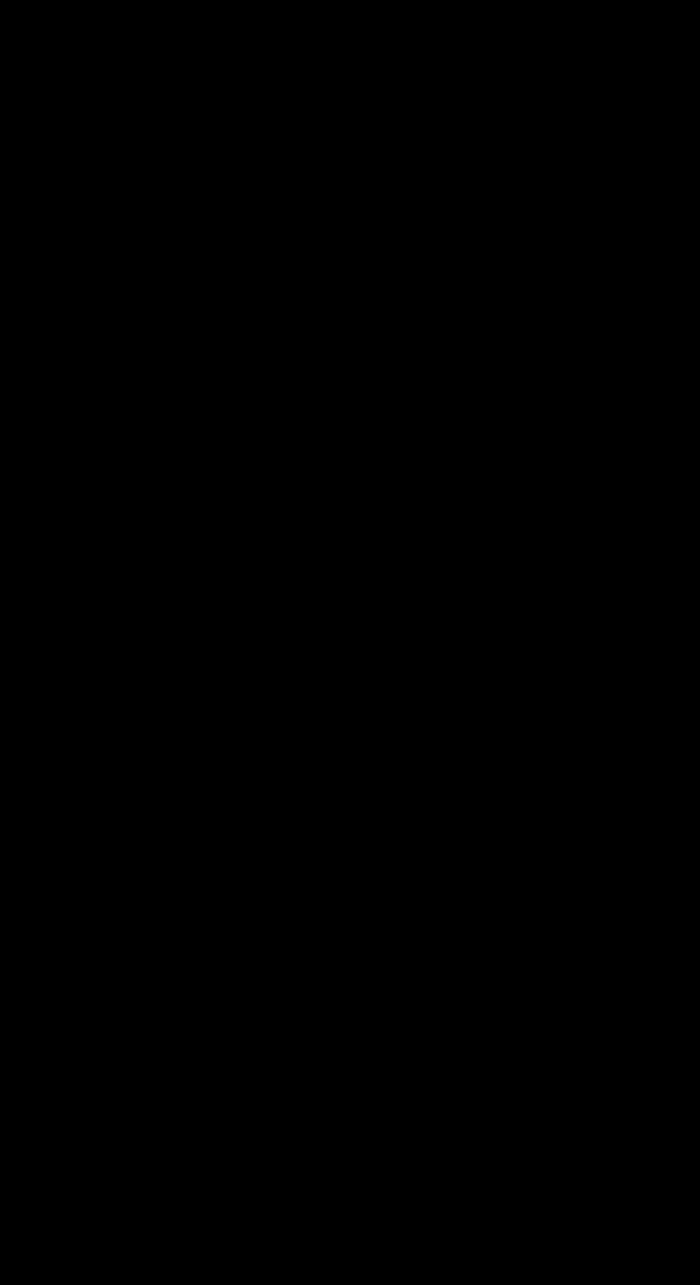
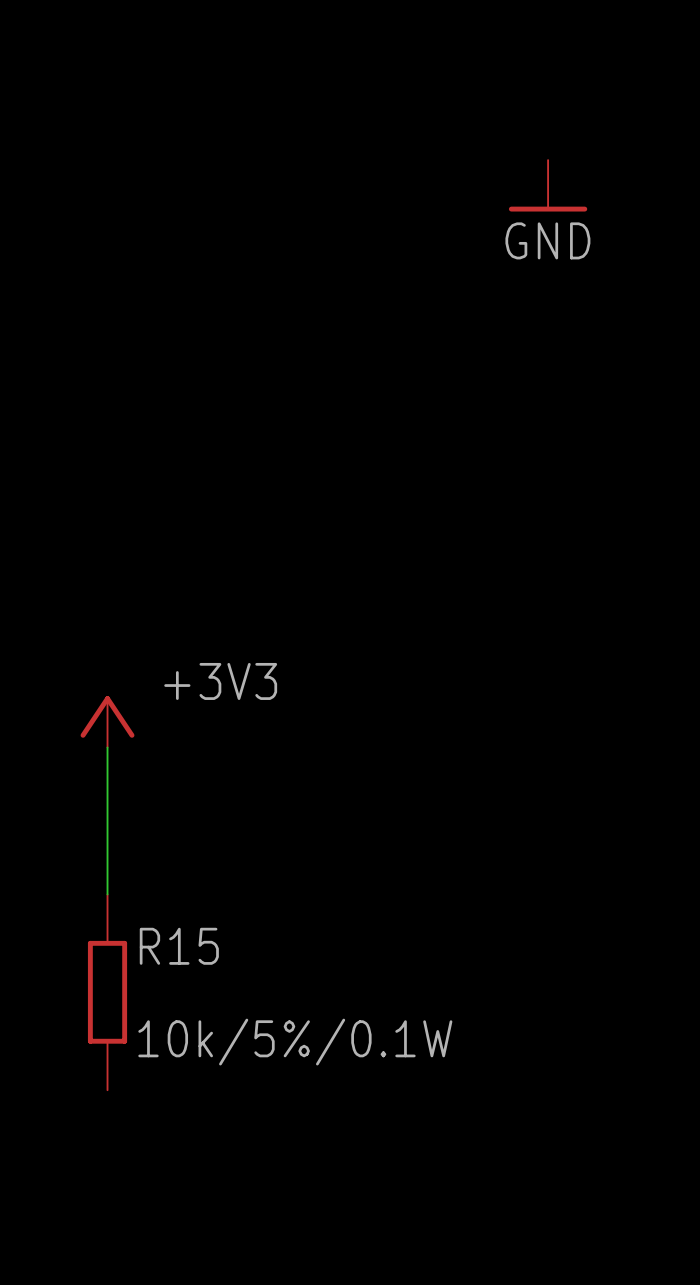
power symbol: none -> GND (548, 185)
power symbol: none -> +3V3 (107, 721)
wire: none -> (107, 747) (107, 894)
R15: none -> 10k/5%/0.1W (107, 992)

